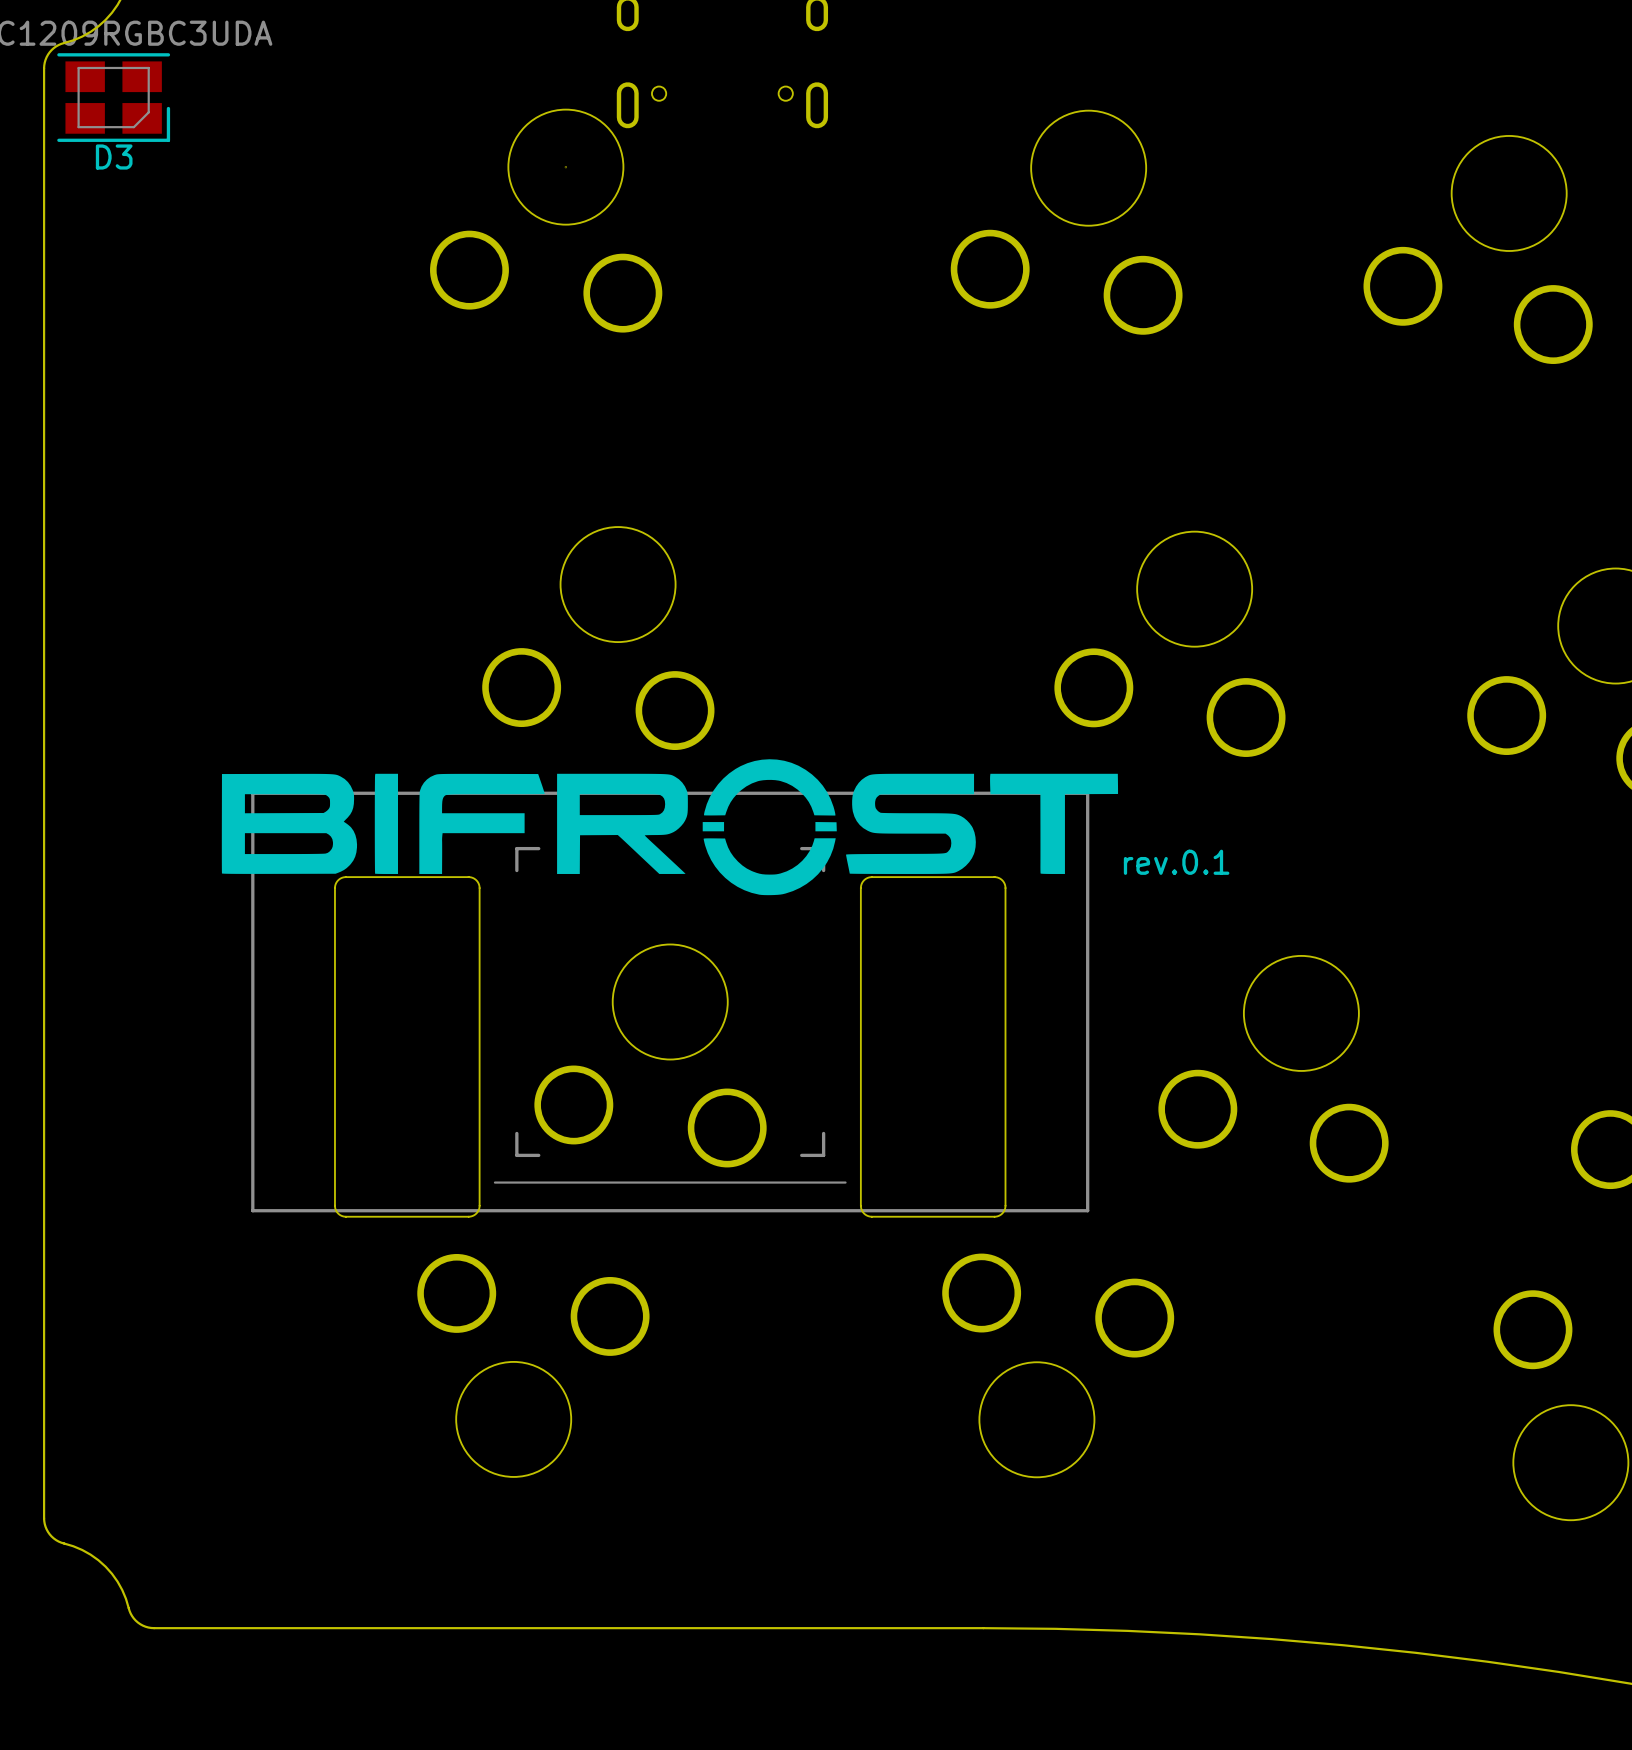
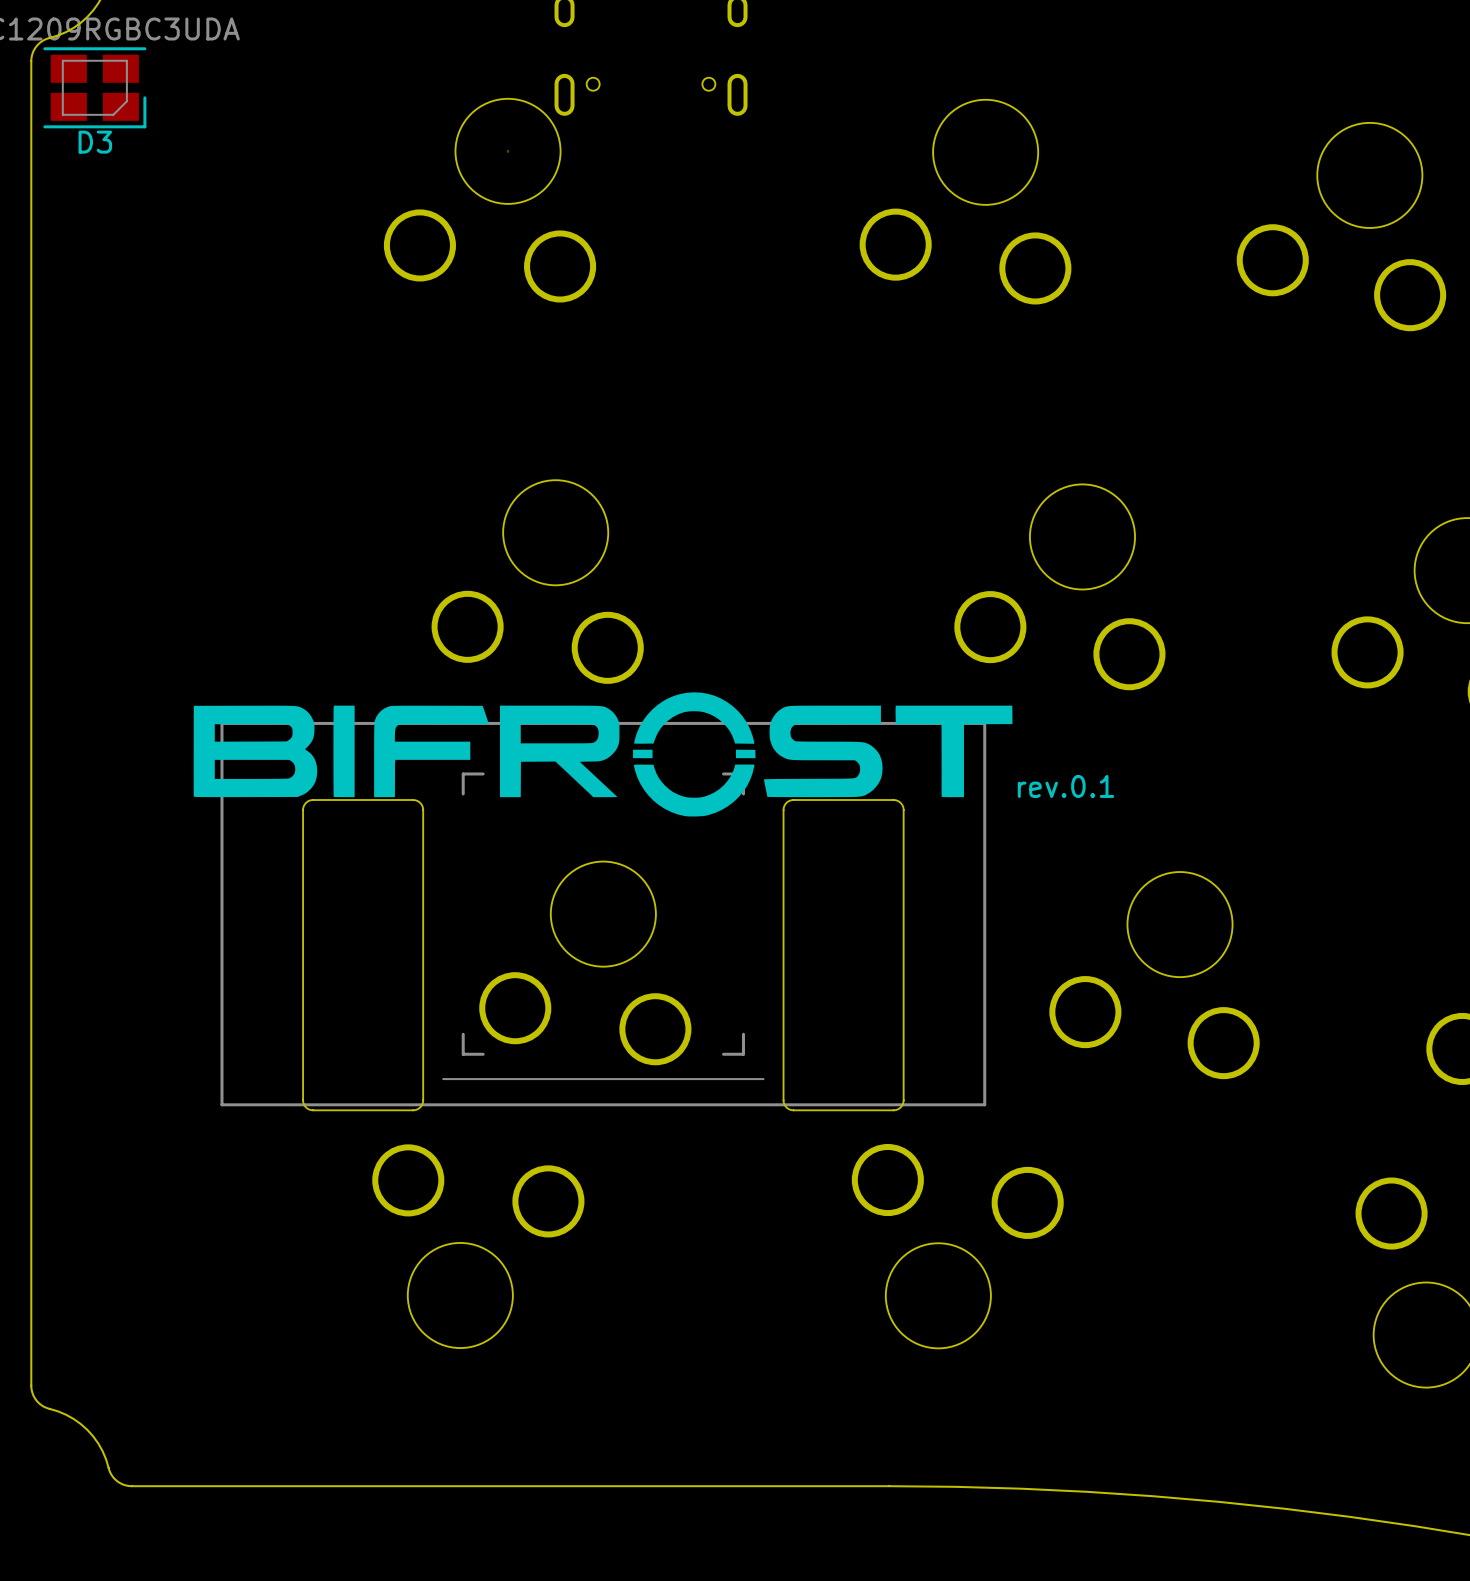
drawing shape: [251, 791, 1090, 1218] -> [220, 721, 987, 1111]

